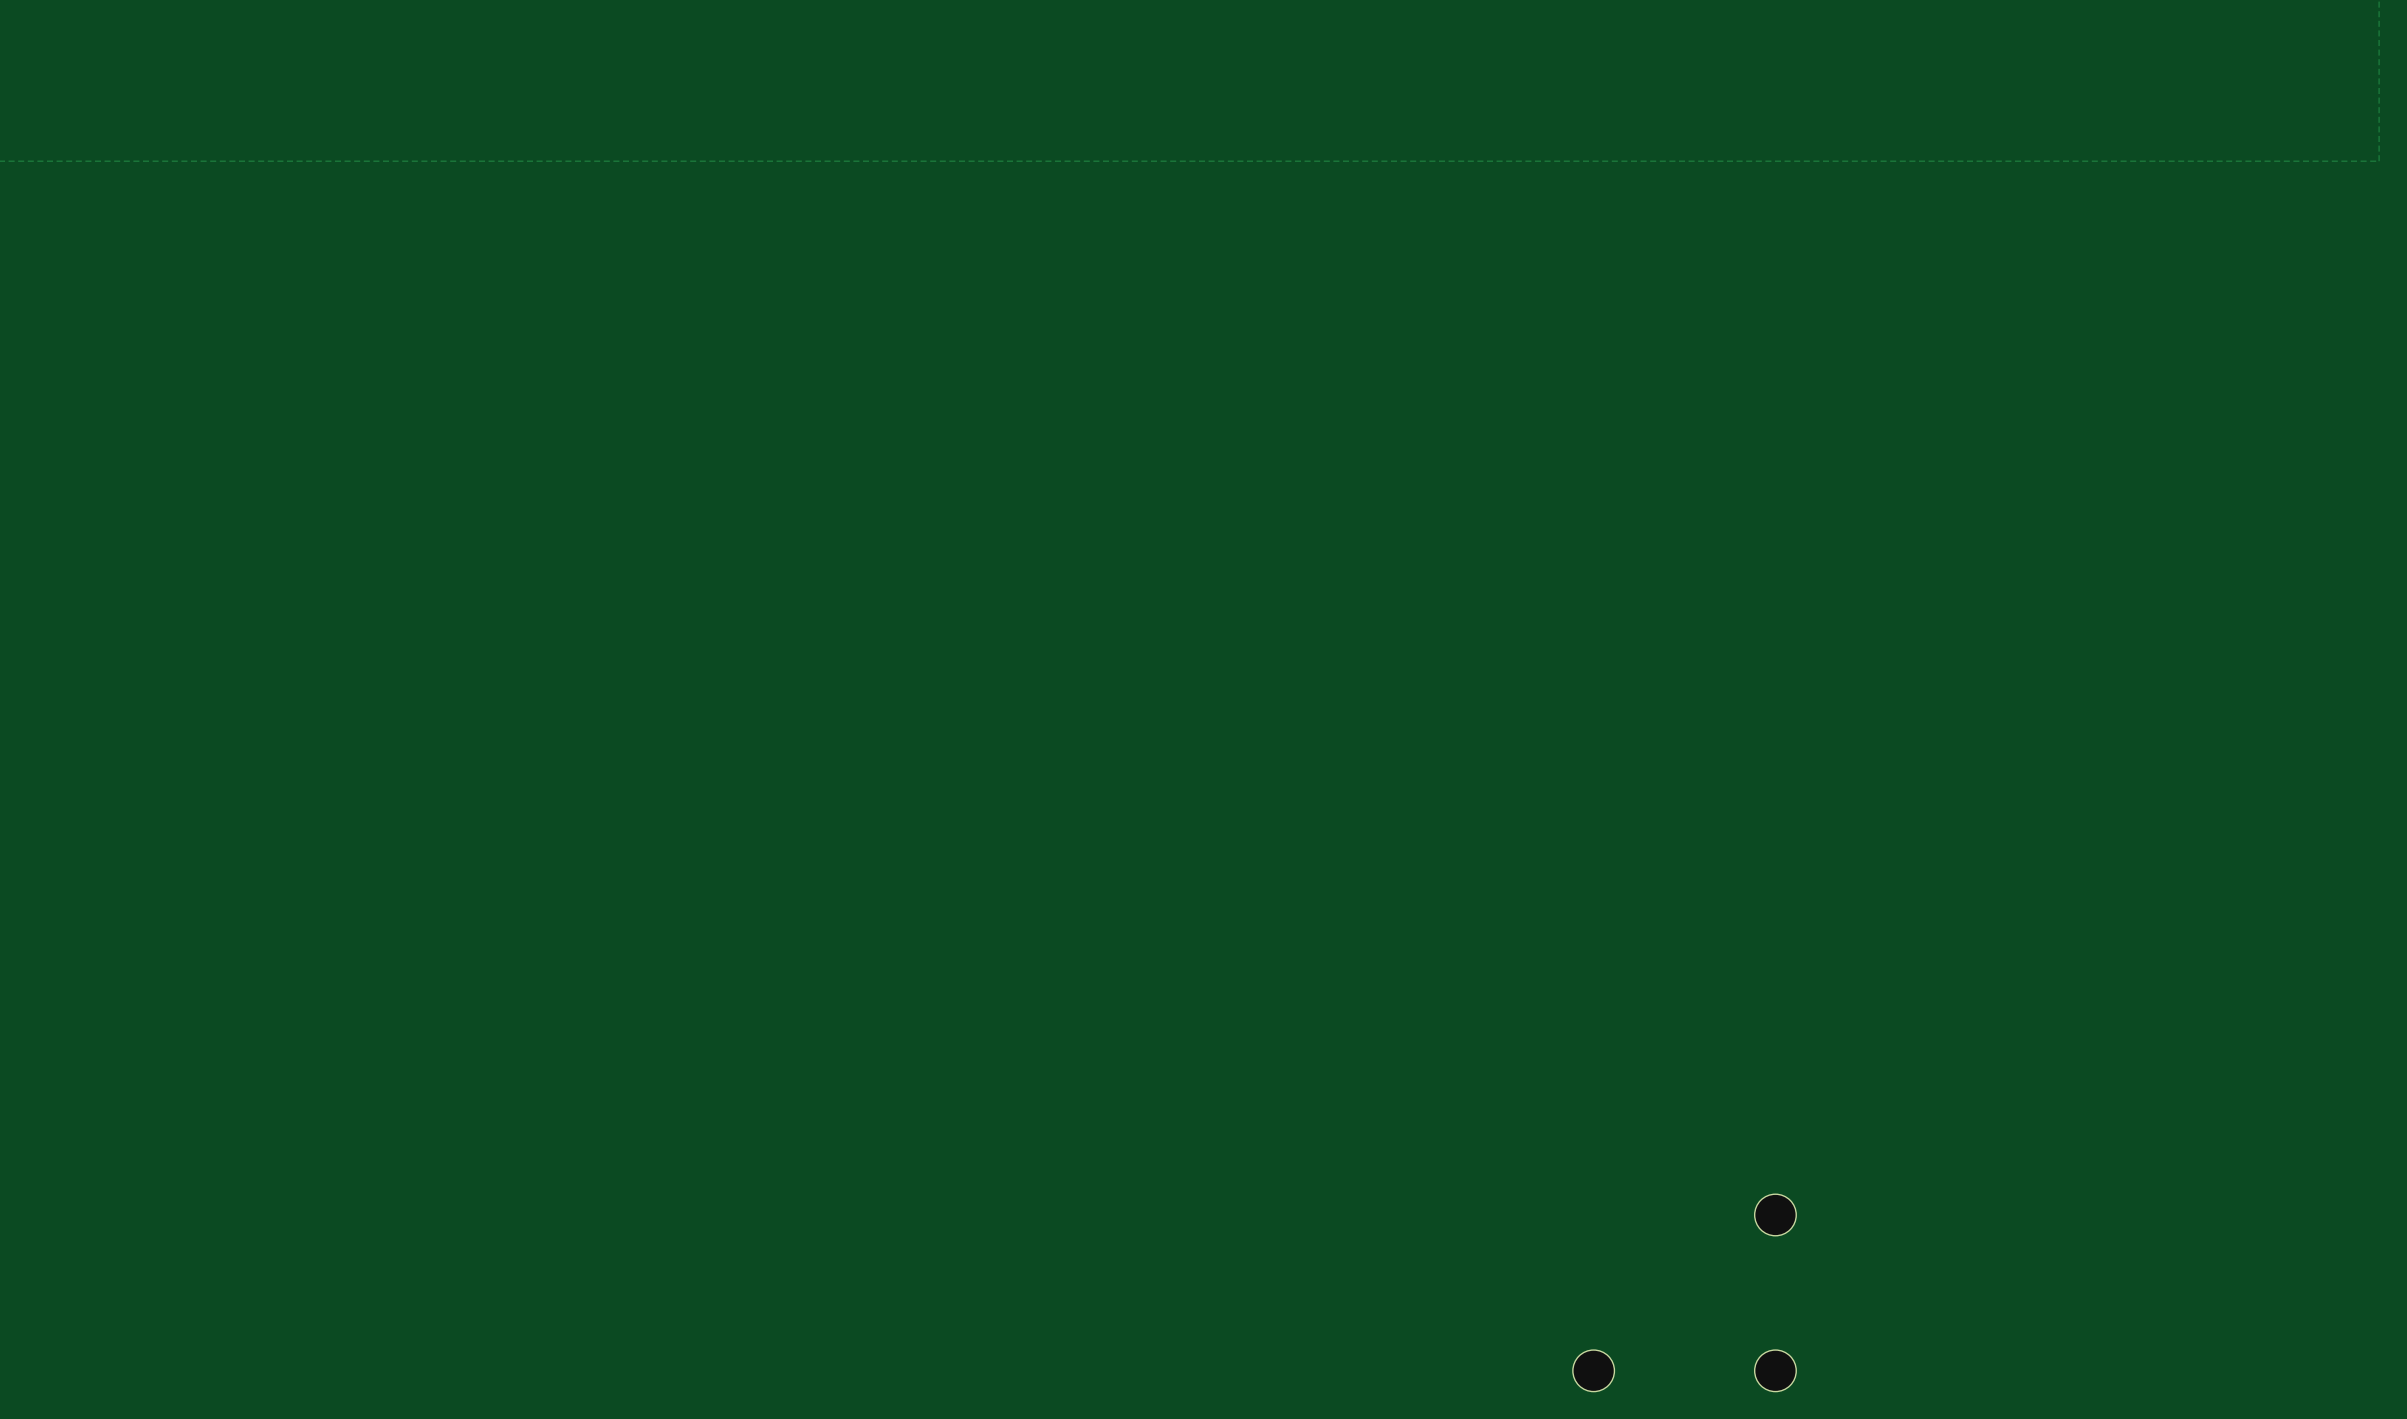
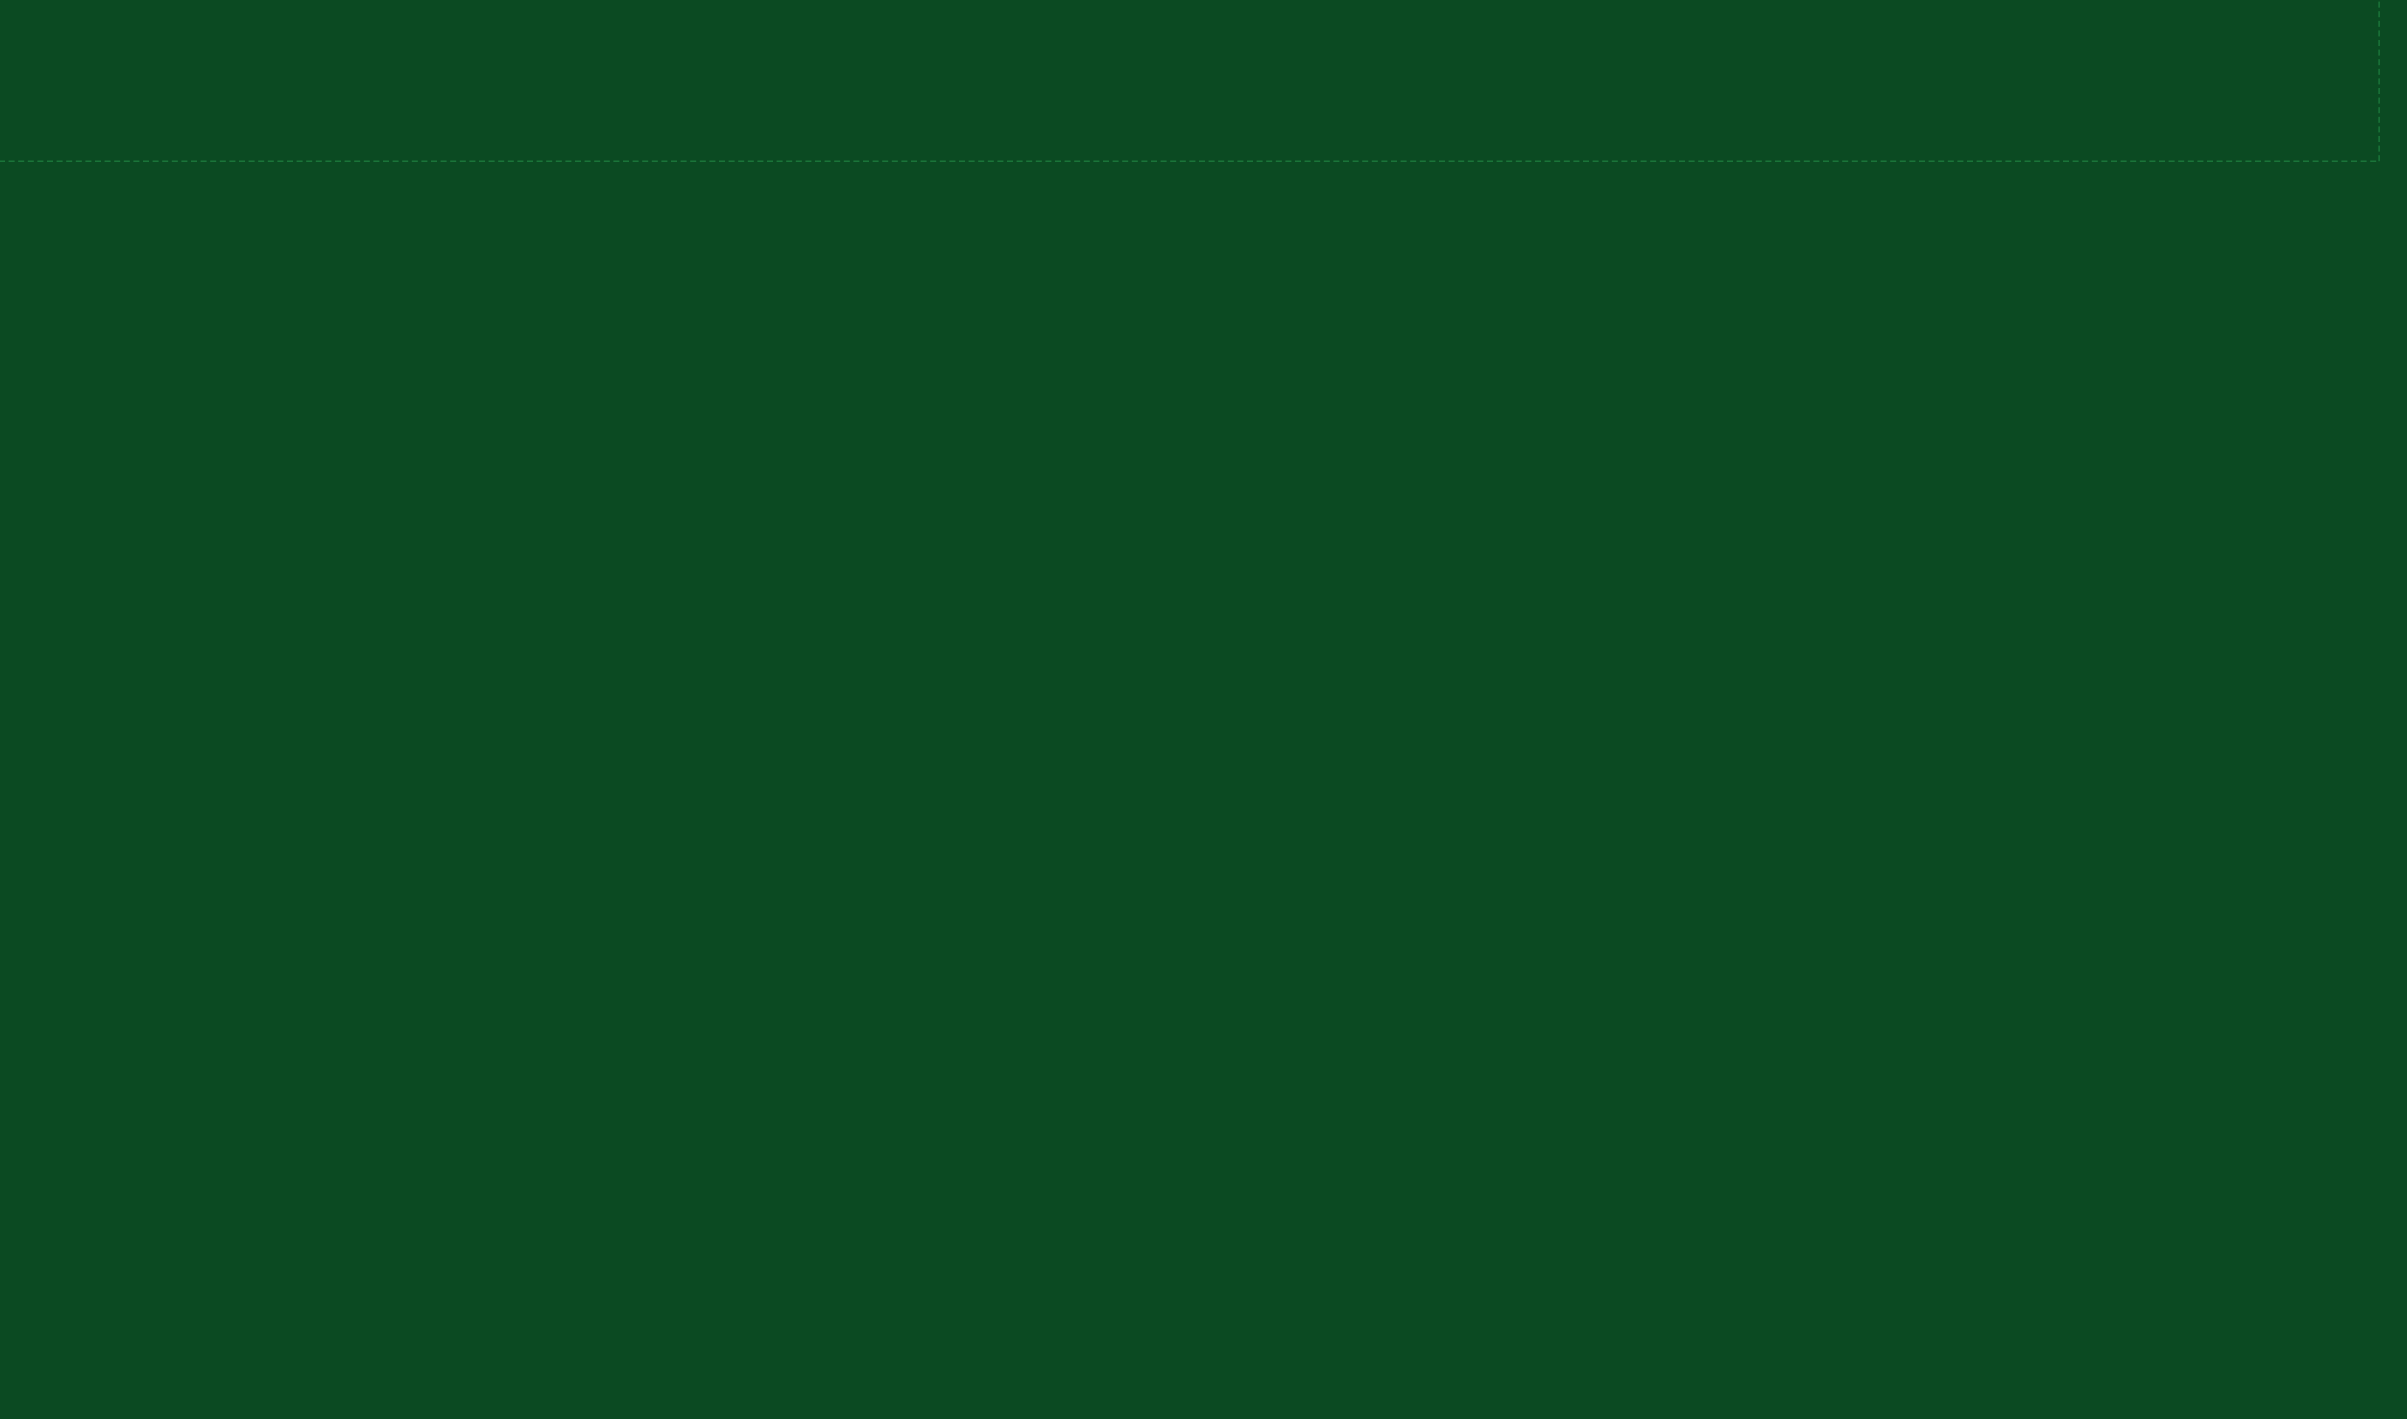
part: (1775, 1214) -> none
part: (1593, 1370) -> none
part: (1775, 1370) -> none

